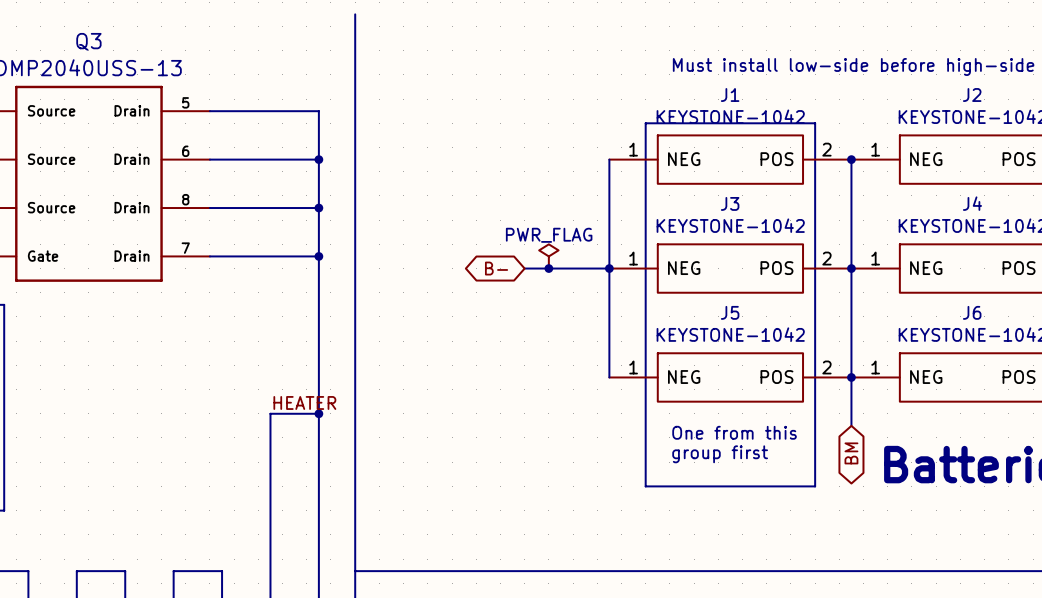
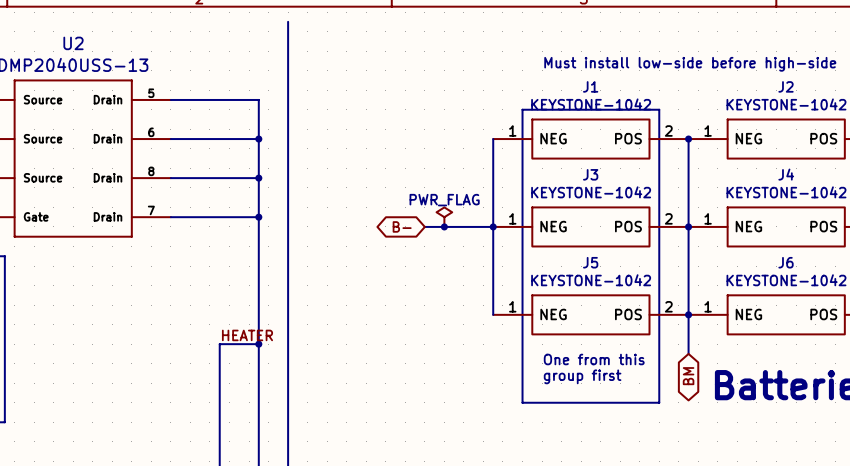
Q3 name: Q3 (88, 41) -> U2 (73, 43)

